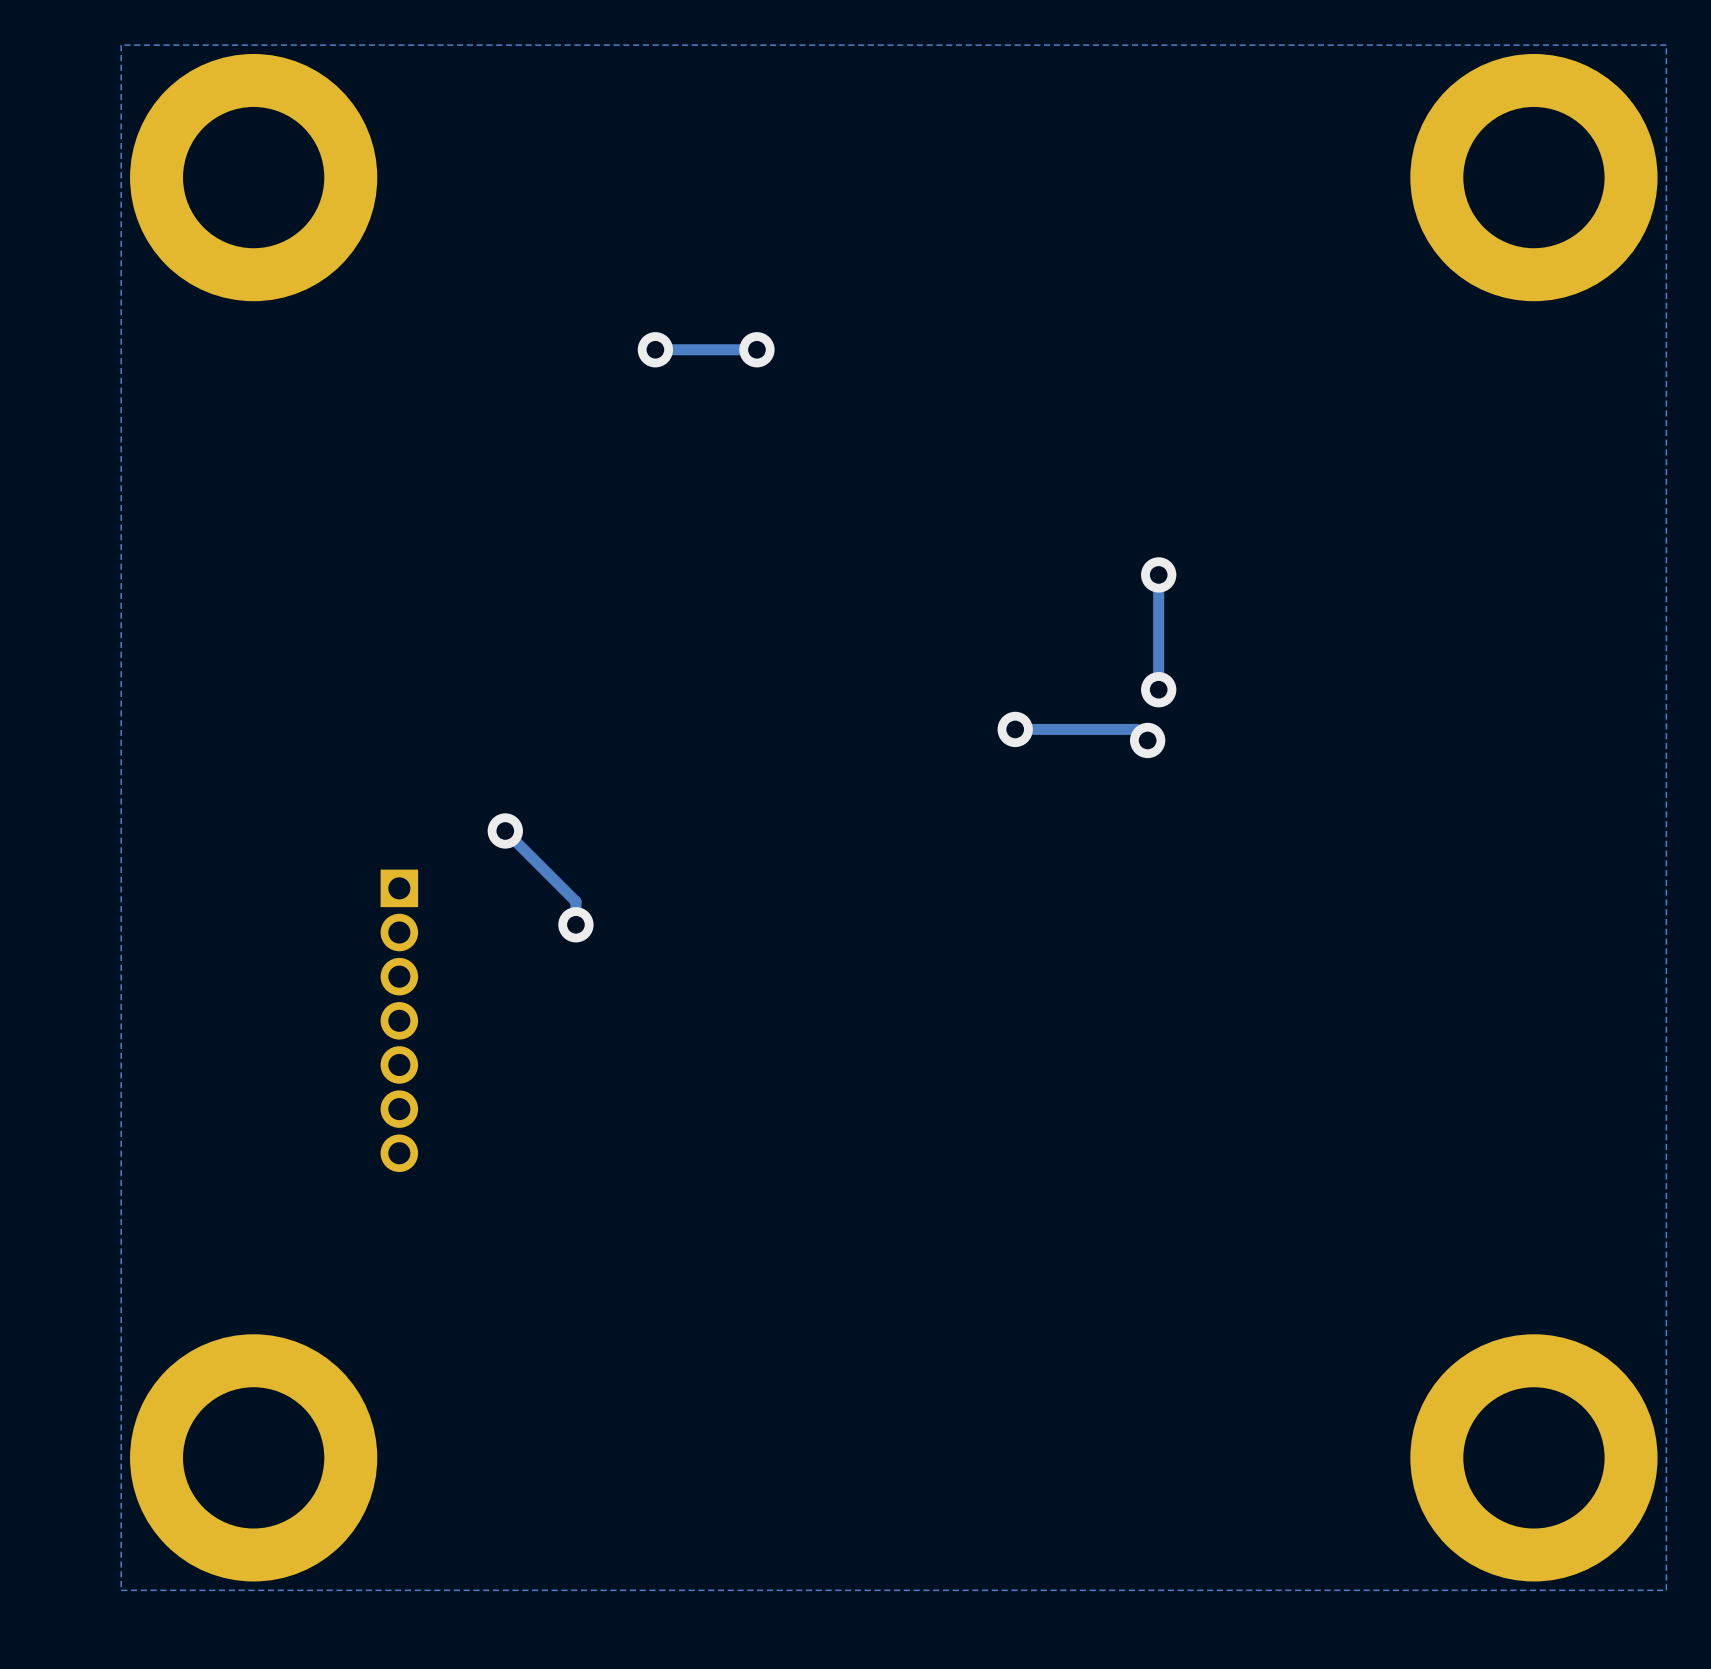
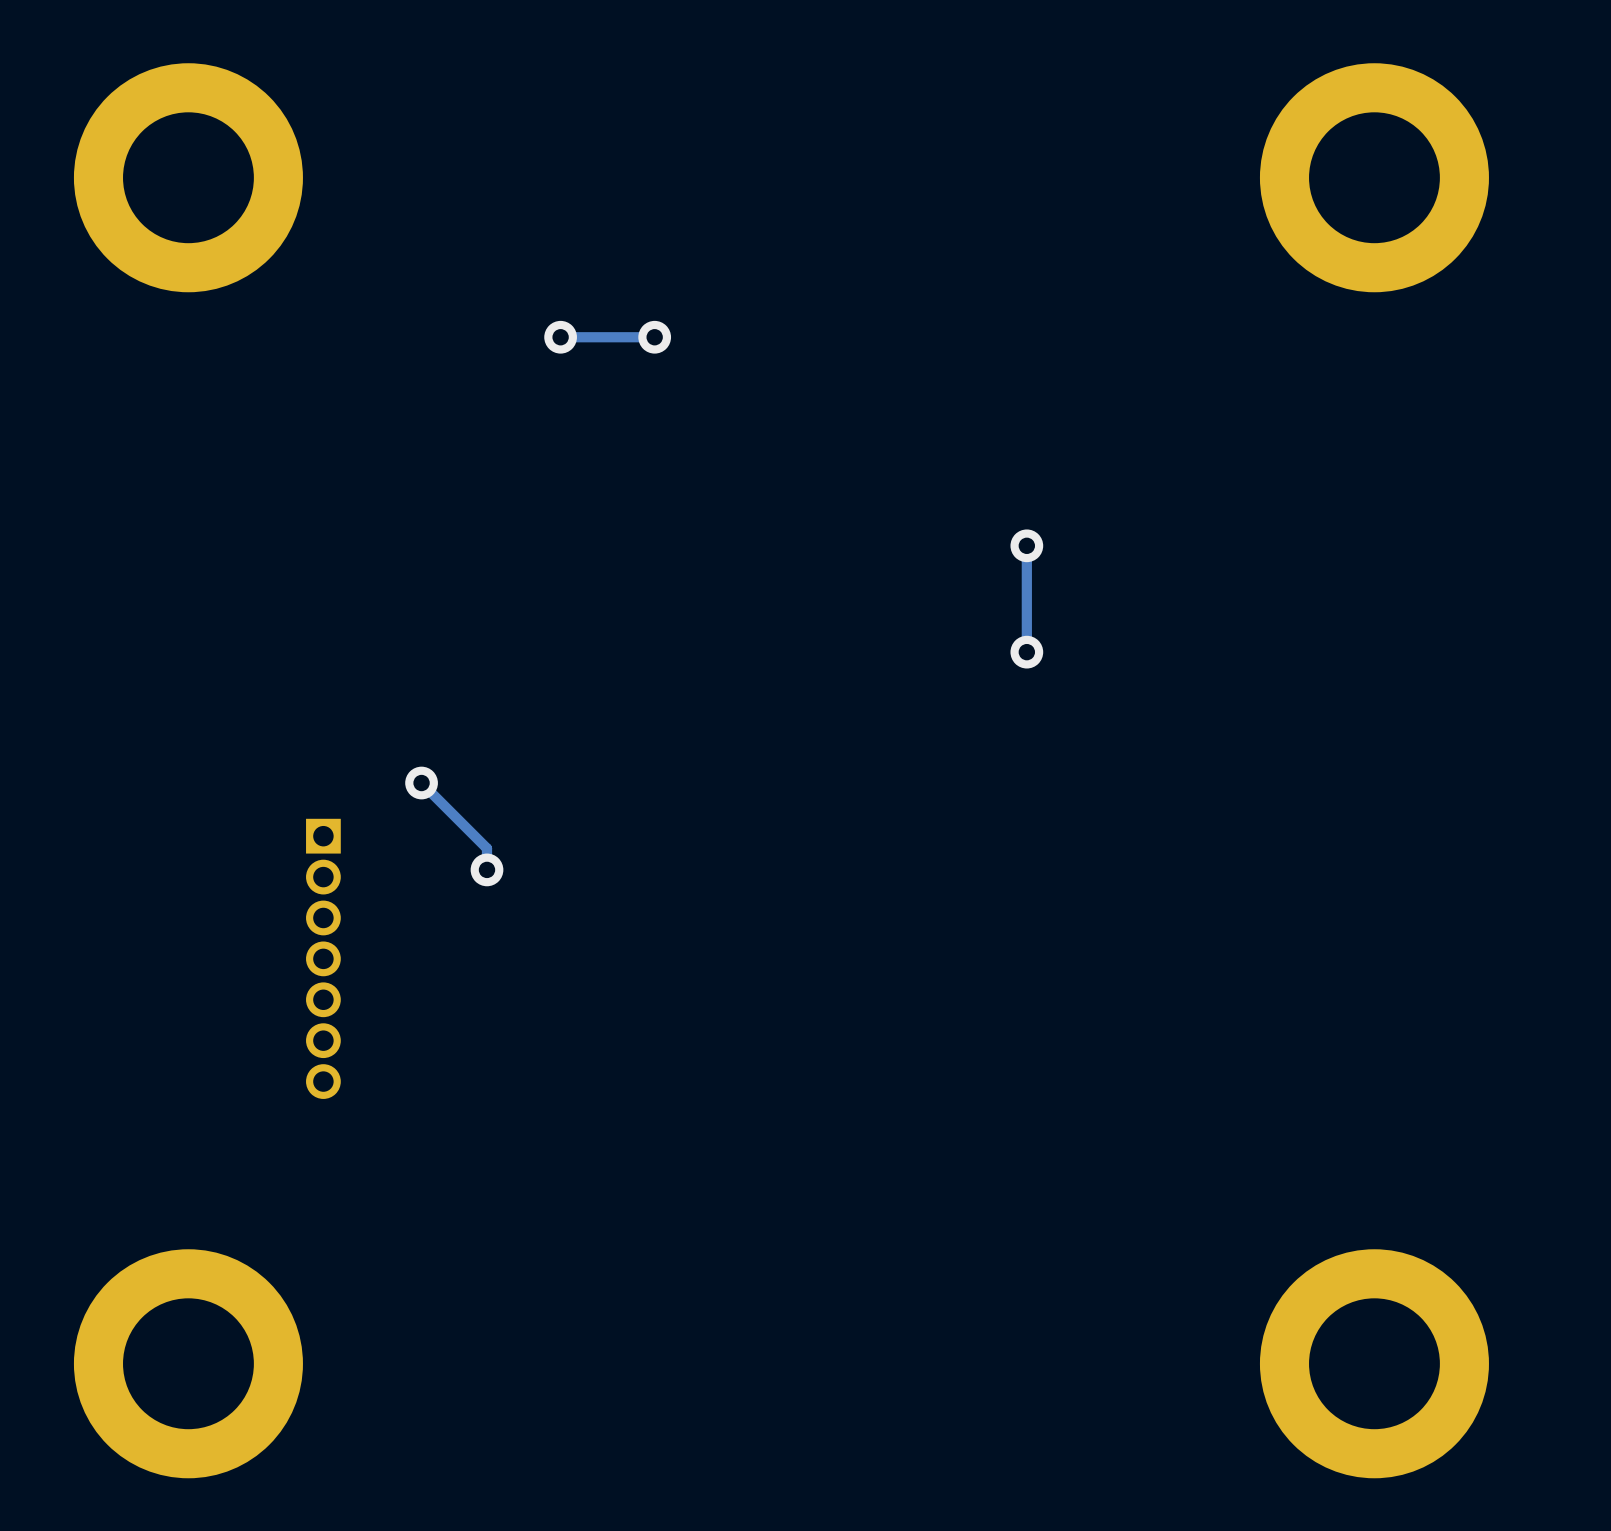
zone outline: (1666, 45) (1666, 1590) (121, 1590) (121, 45) (1666, 45) -> none
track: (1015, 729) (1136, 729) (1147, 740) -> none
via: (1015, 729) -> none
via: (1147, 740) -> none

